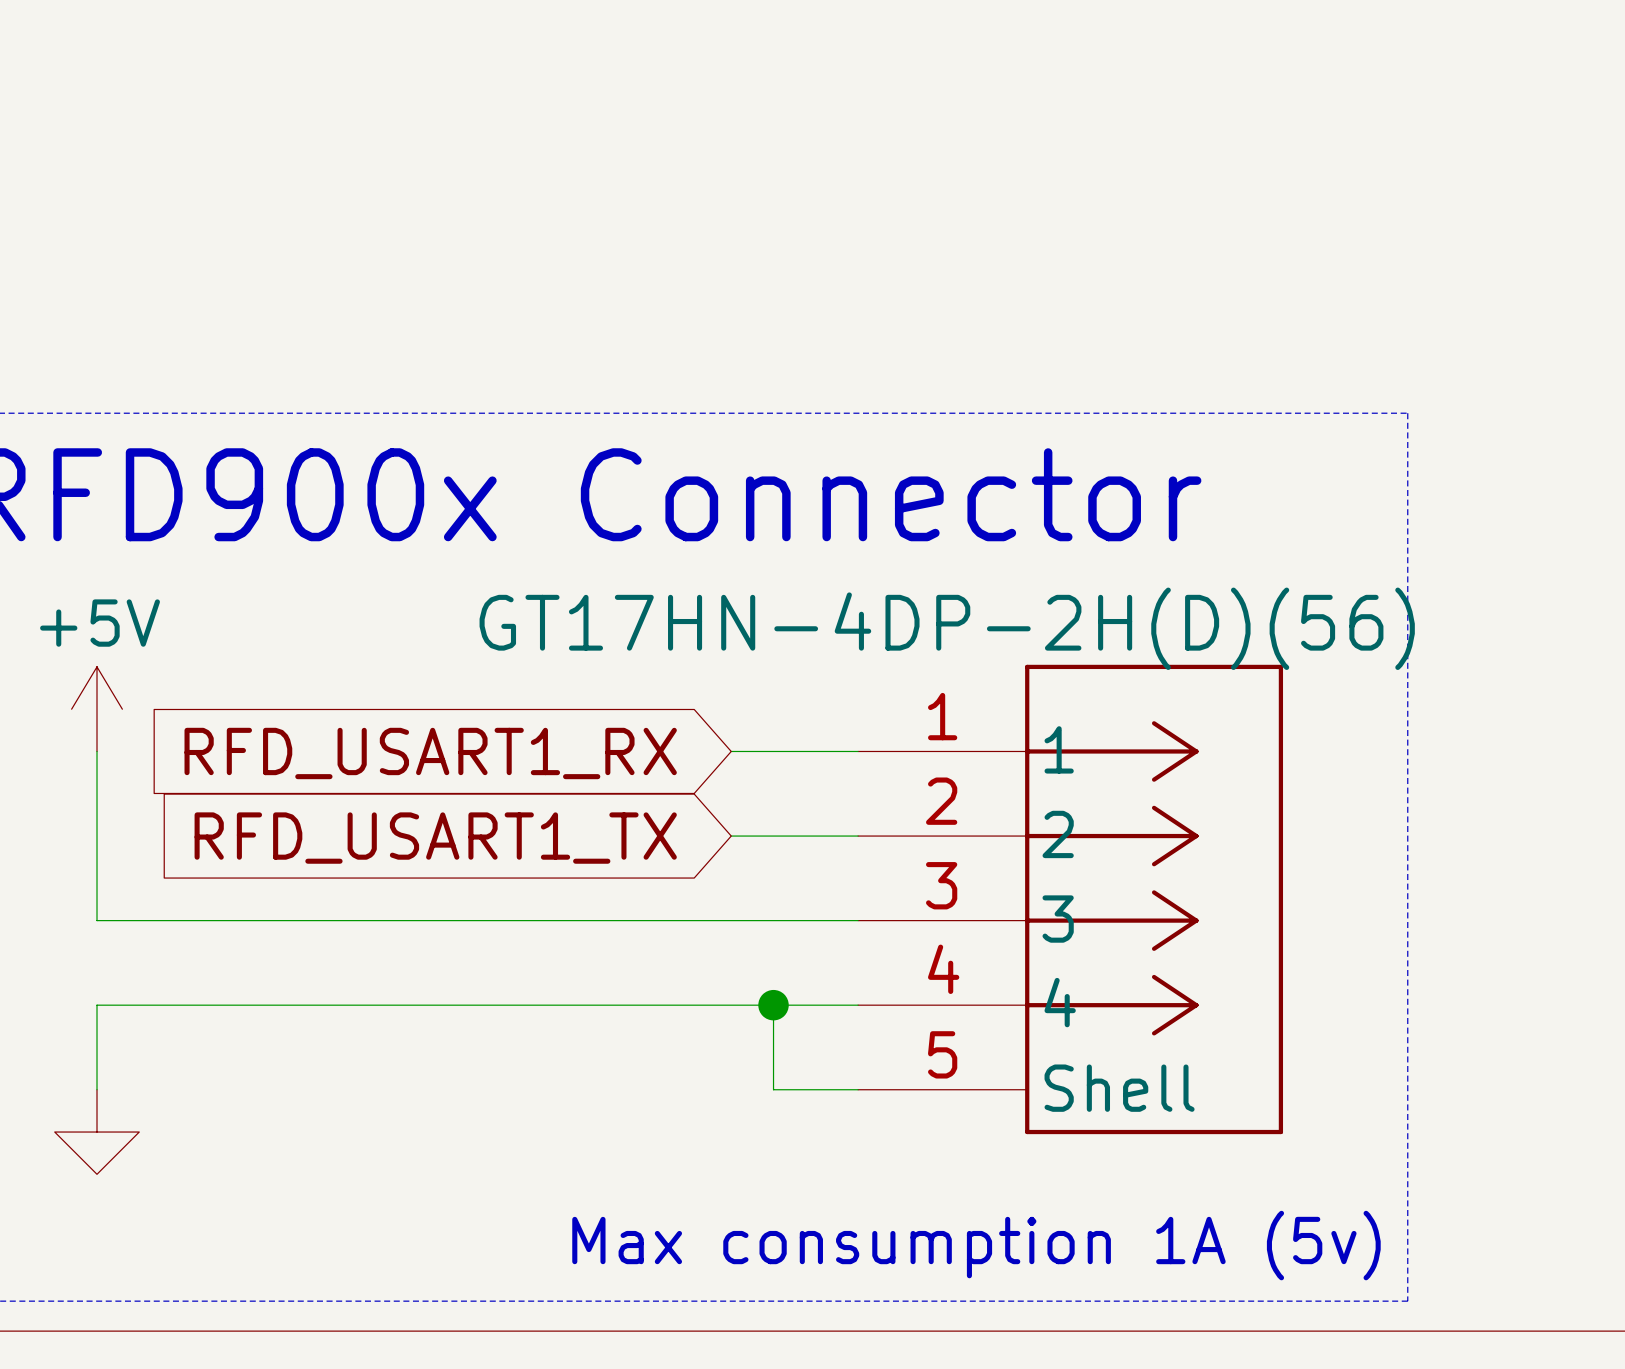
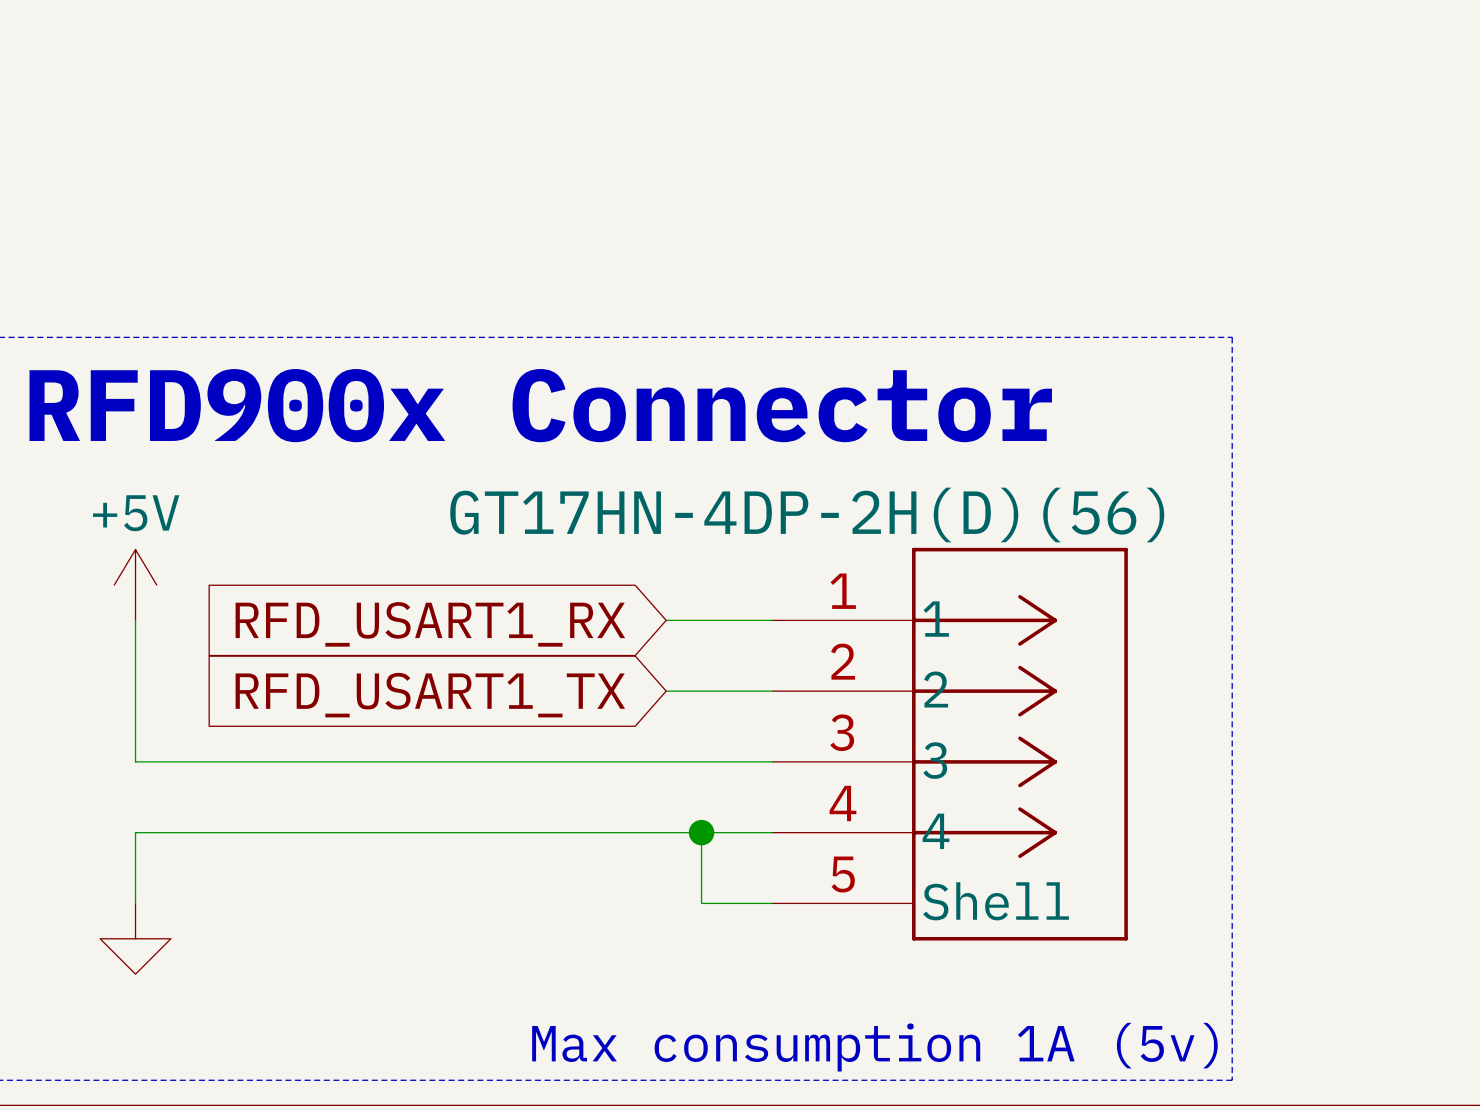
text position: Max consumption 1A (5v) (976, 1245) -> Max consumption 1A (5v) (874, 1047)

